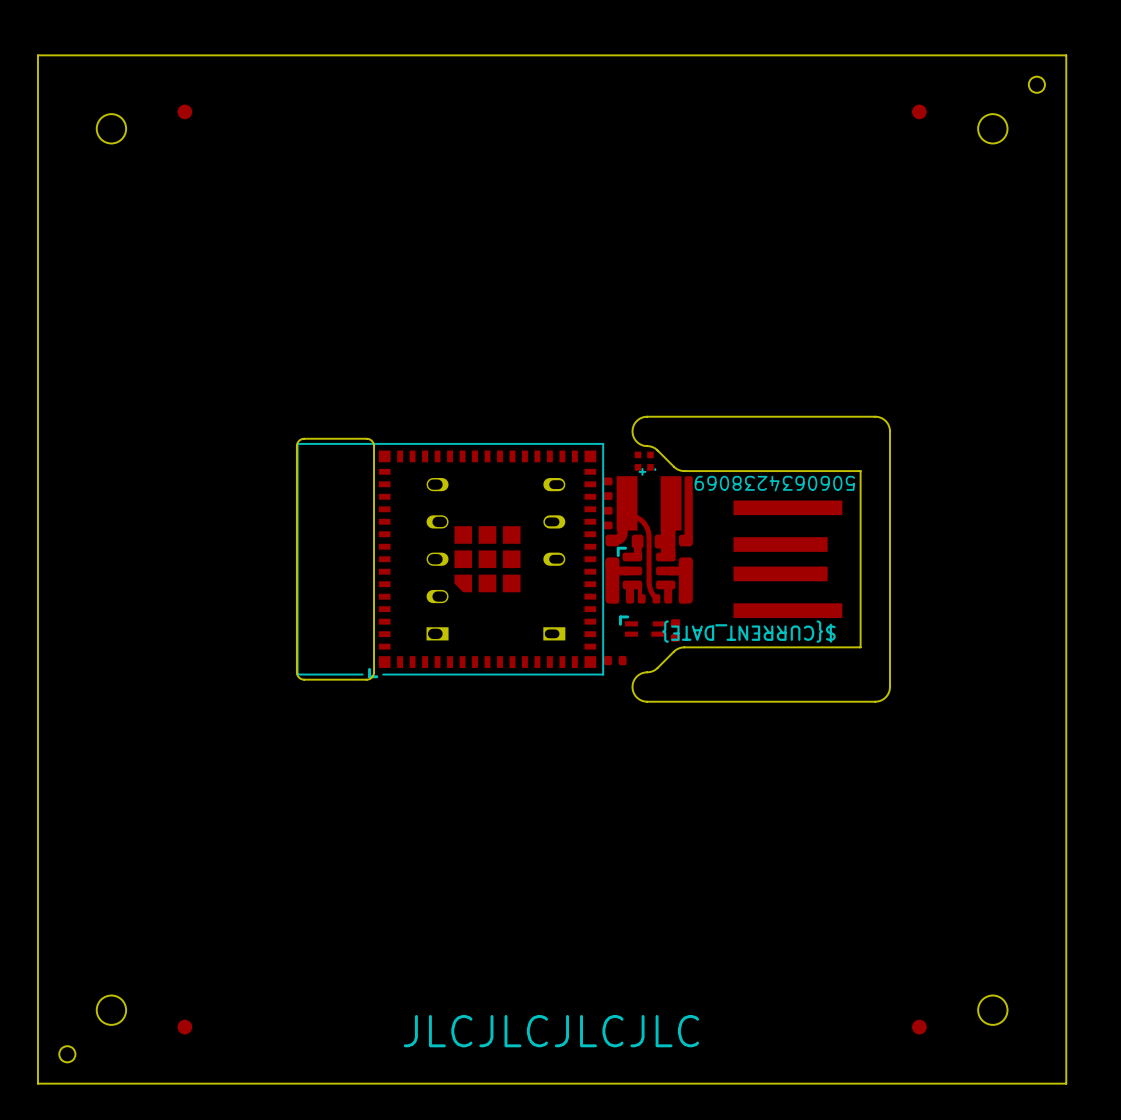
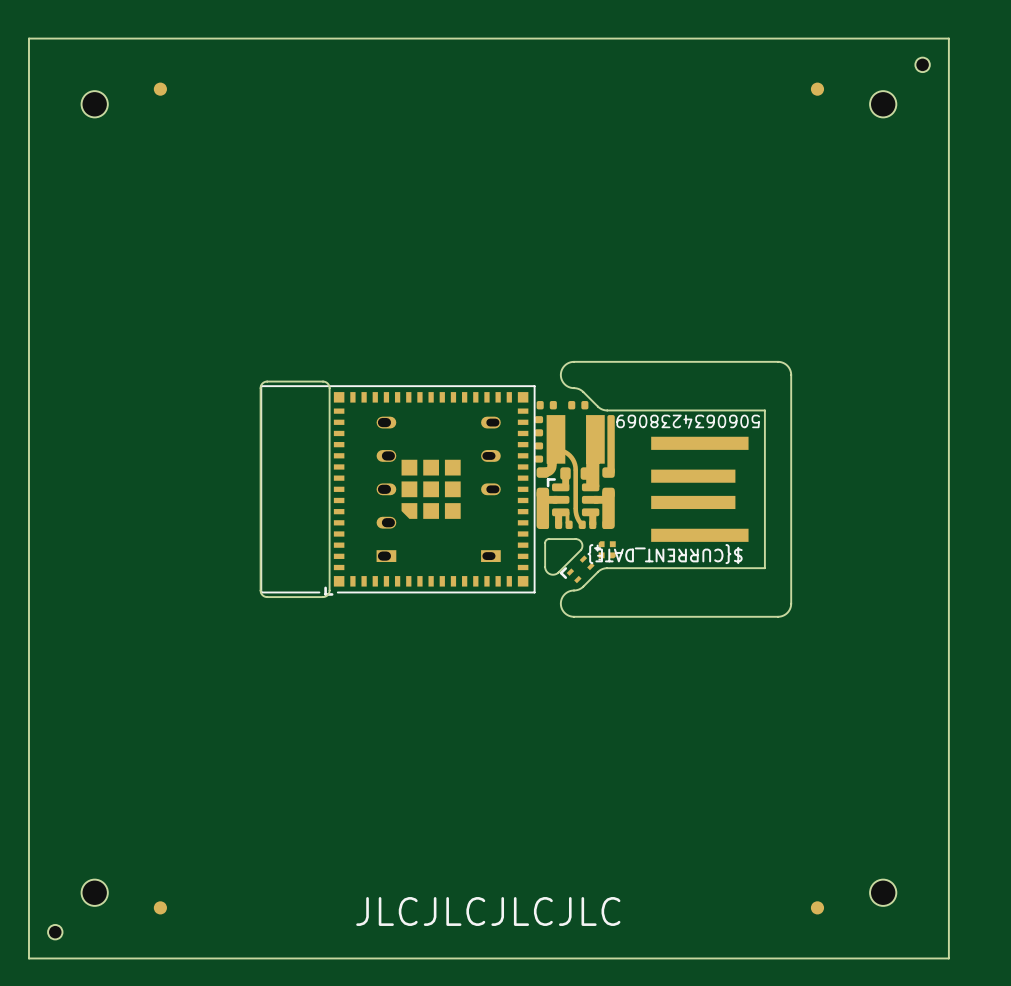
part footprint: [634, 451, 656, 476] -> [568, 401, 589, 410]
board edge: none -> (549, 539) (576, 539) (582, 544) (580, 550) (554, 574) (548, 573) (545, 567) (545, 542) (549, 539)
part footprint: [670, 619, 681, 642] -> [594, 541, 616, 561]
part: (642, 626) -> none
part: none -> (577, 569)
part position: (615, 660) -> (546, 405)

